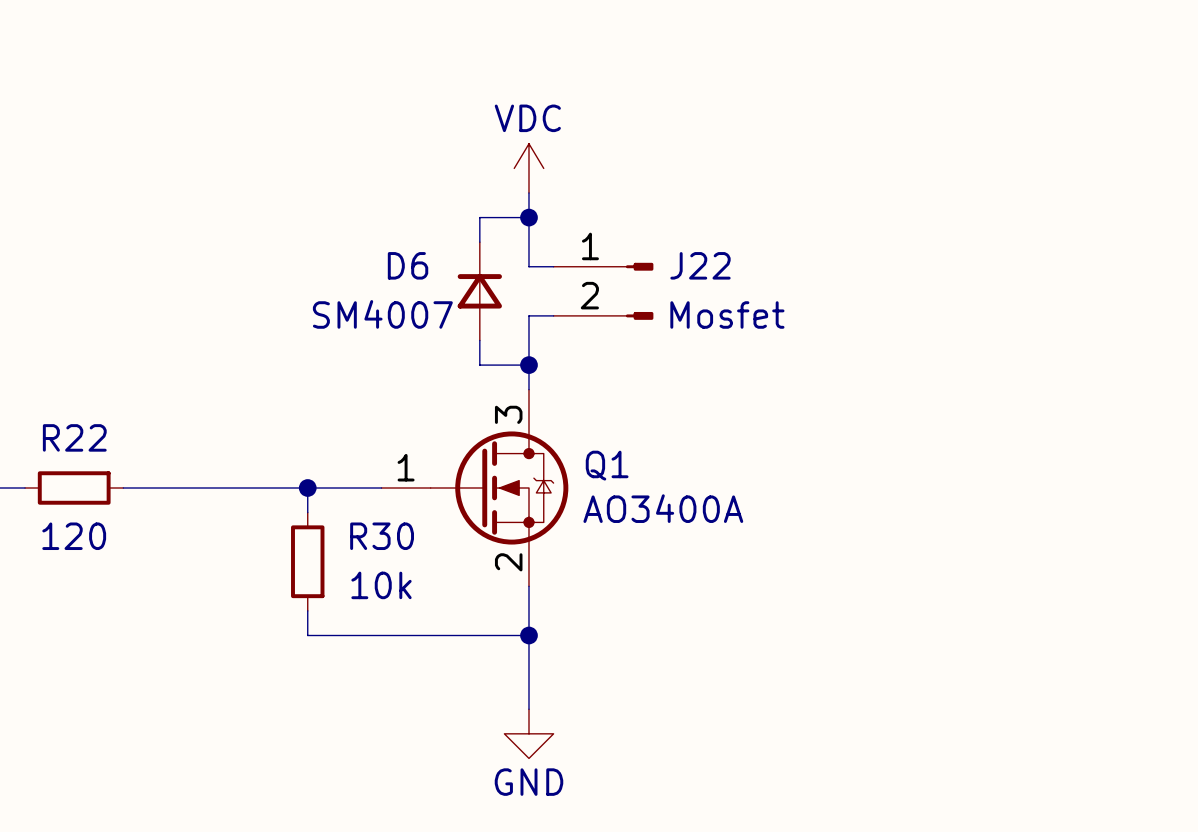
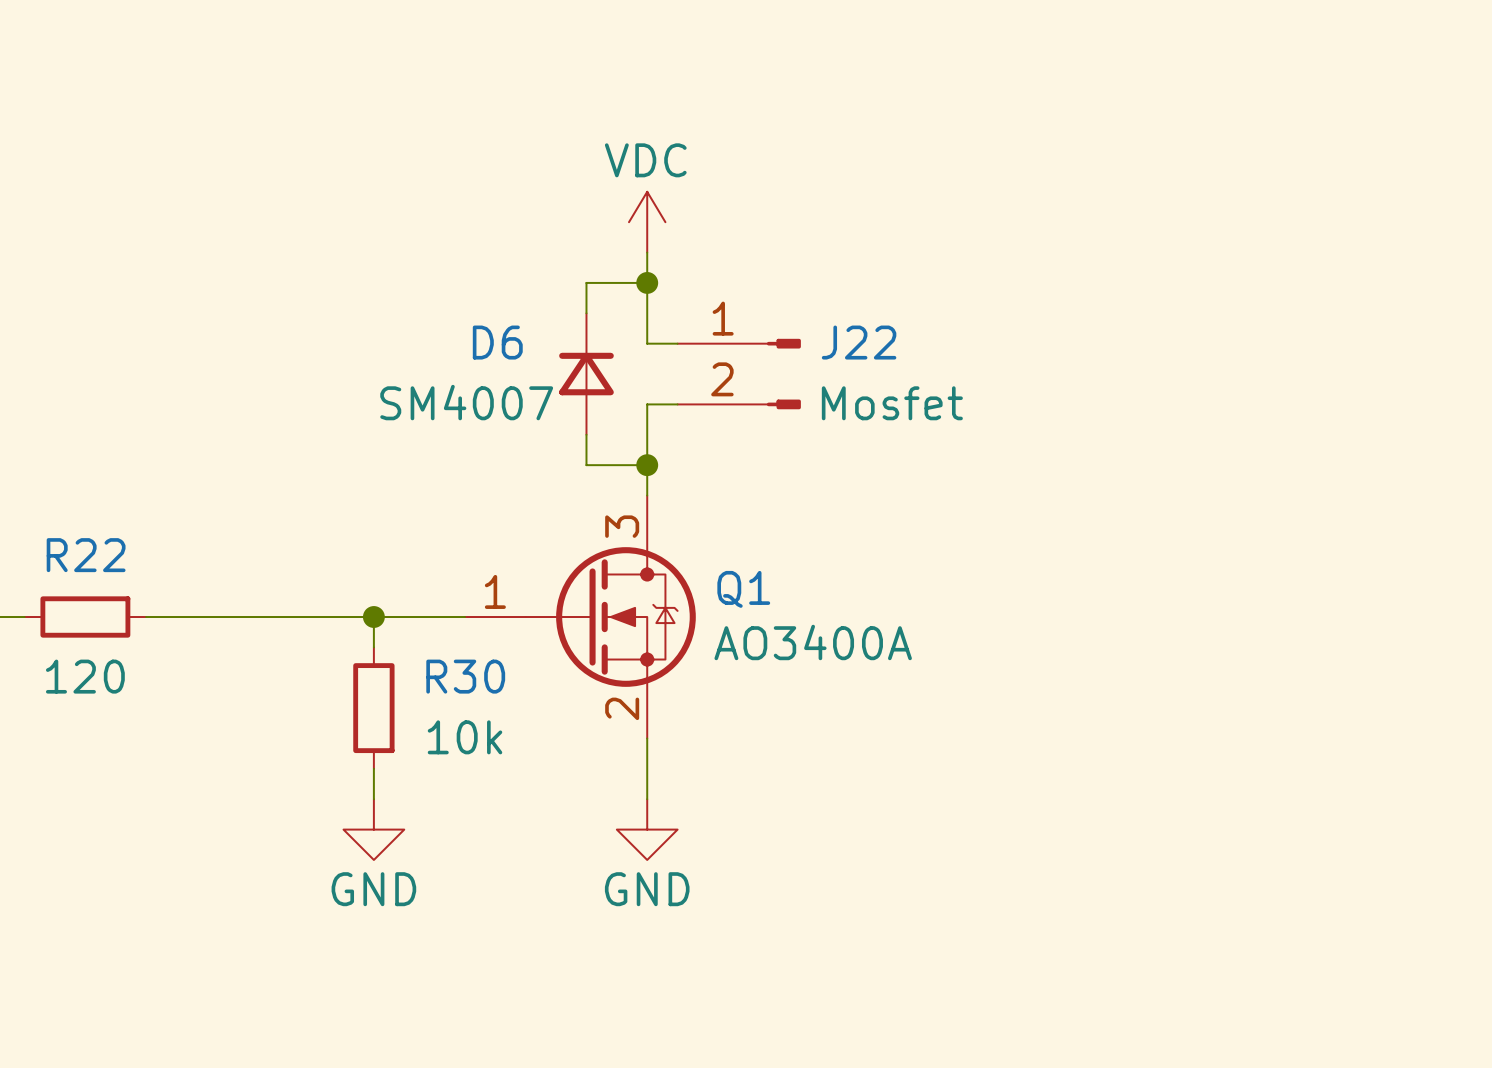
wire: (307, 635) (528, 635) (528, 709) -> none
junction: (528, 635) -> none
power symbol: none -> GND (373, 829)
power symbol position: GND (528, 733) -> GND (647, 829)

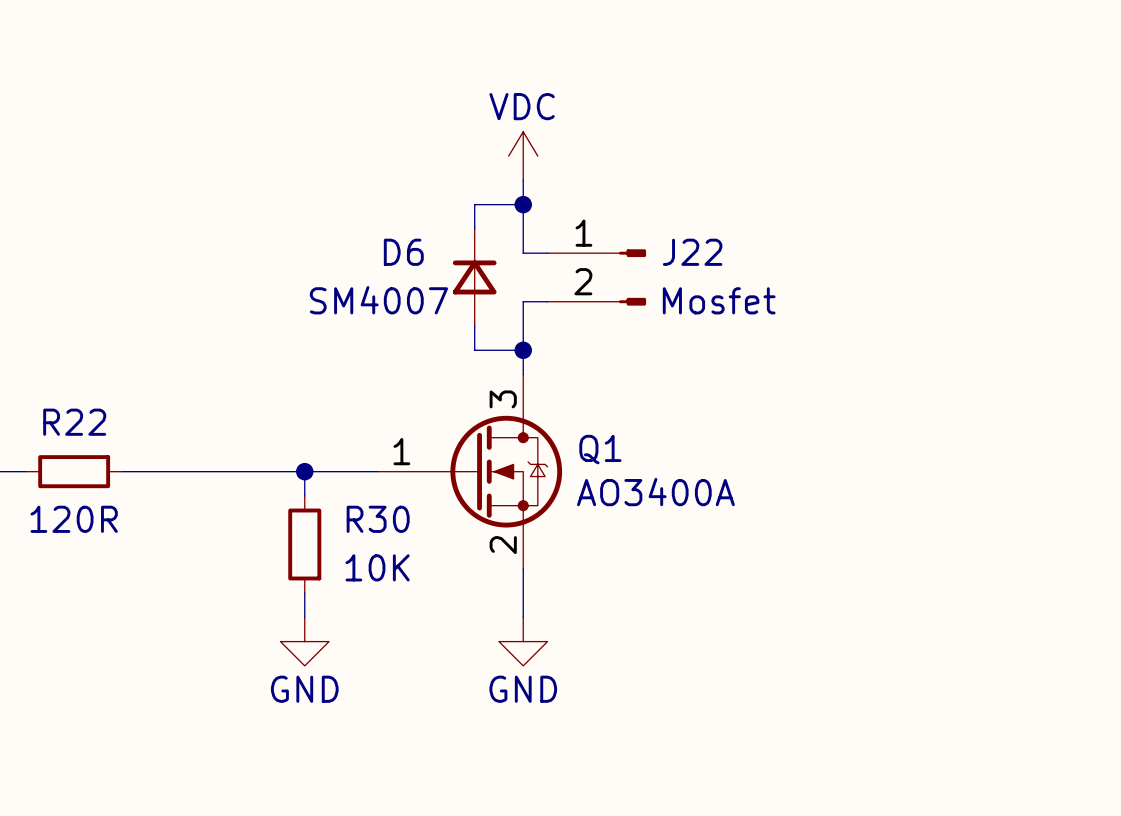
R22 value: 120 (85, 676) -> 120R (74, 519)
R30 value: 10k (465, 737) -> 10K (377, 567)

